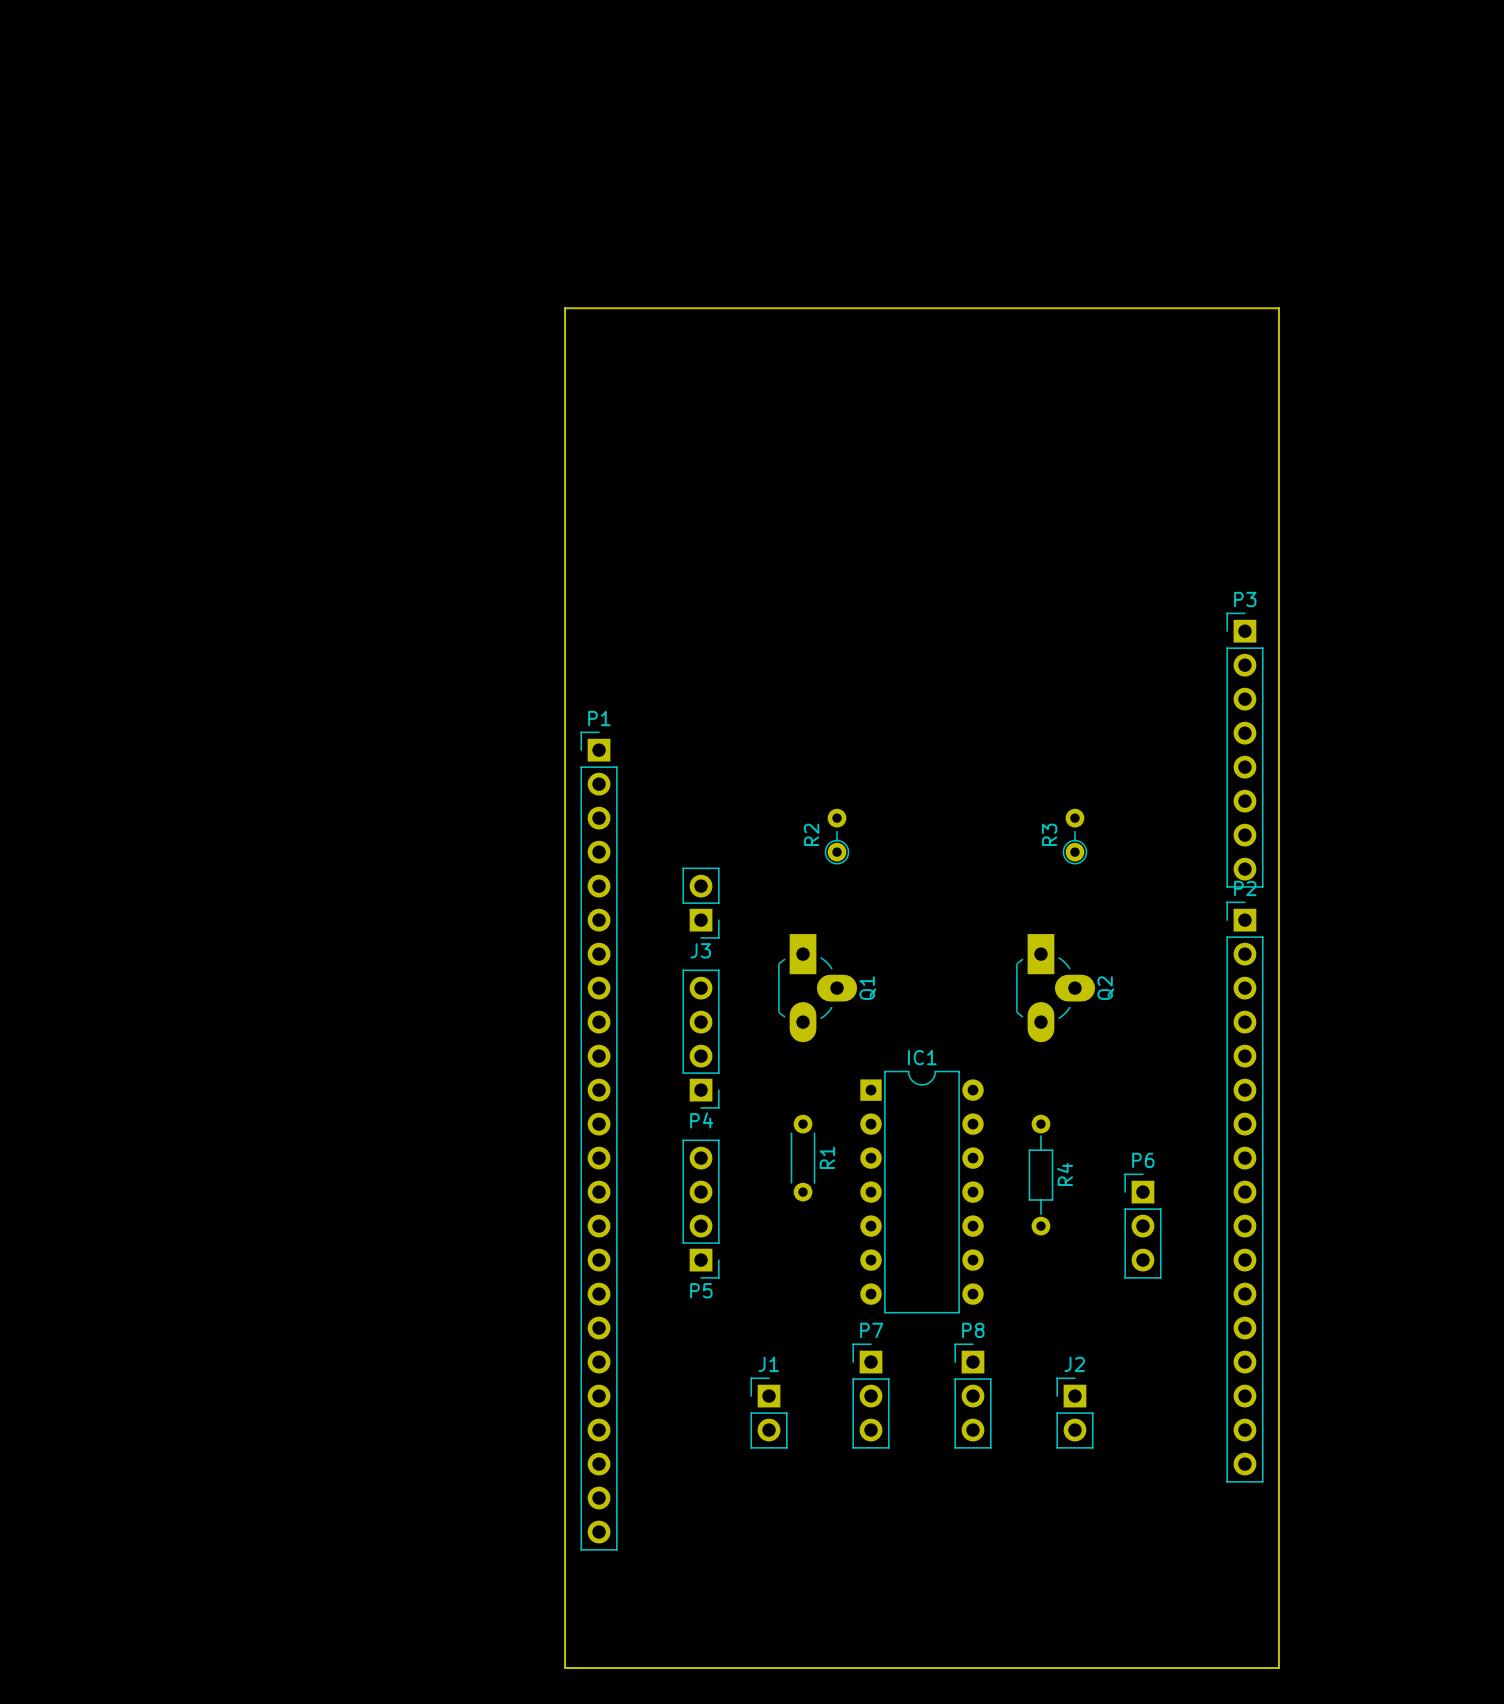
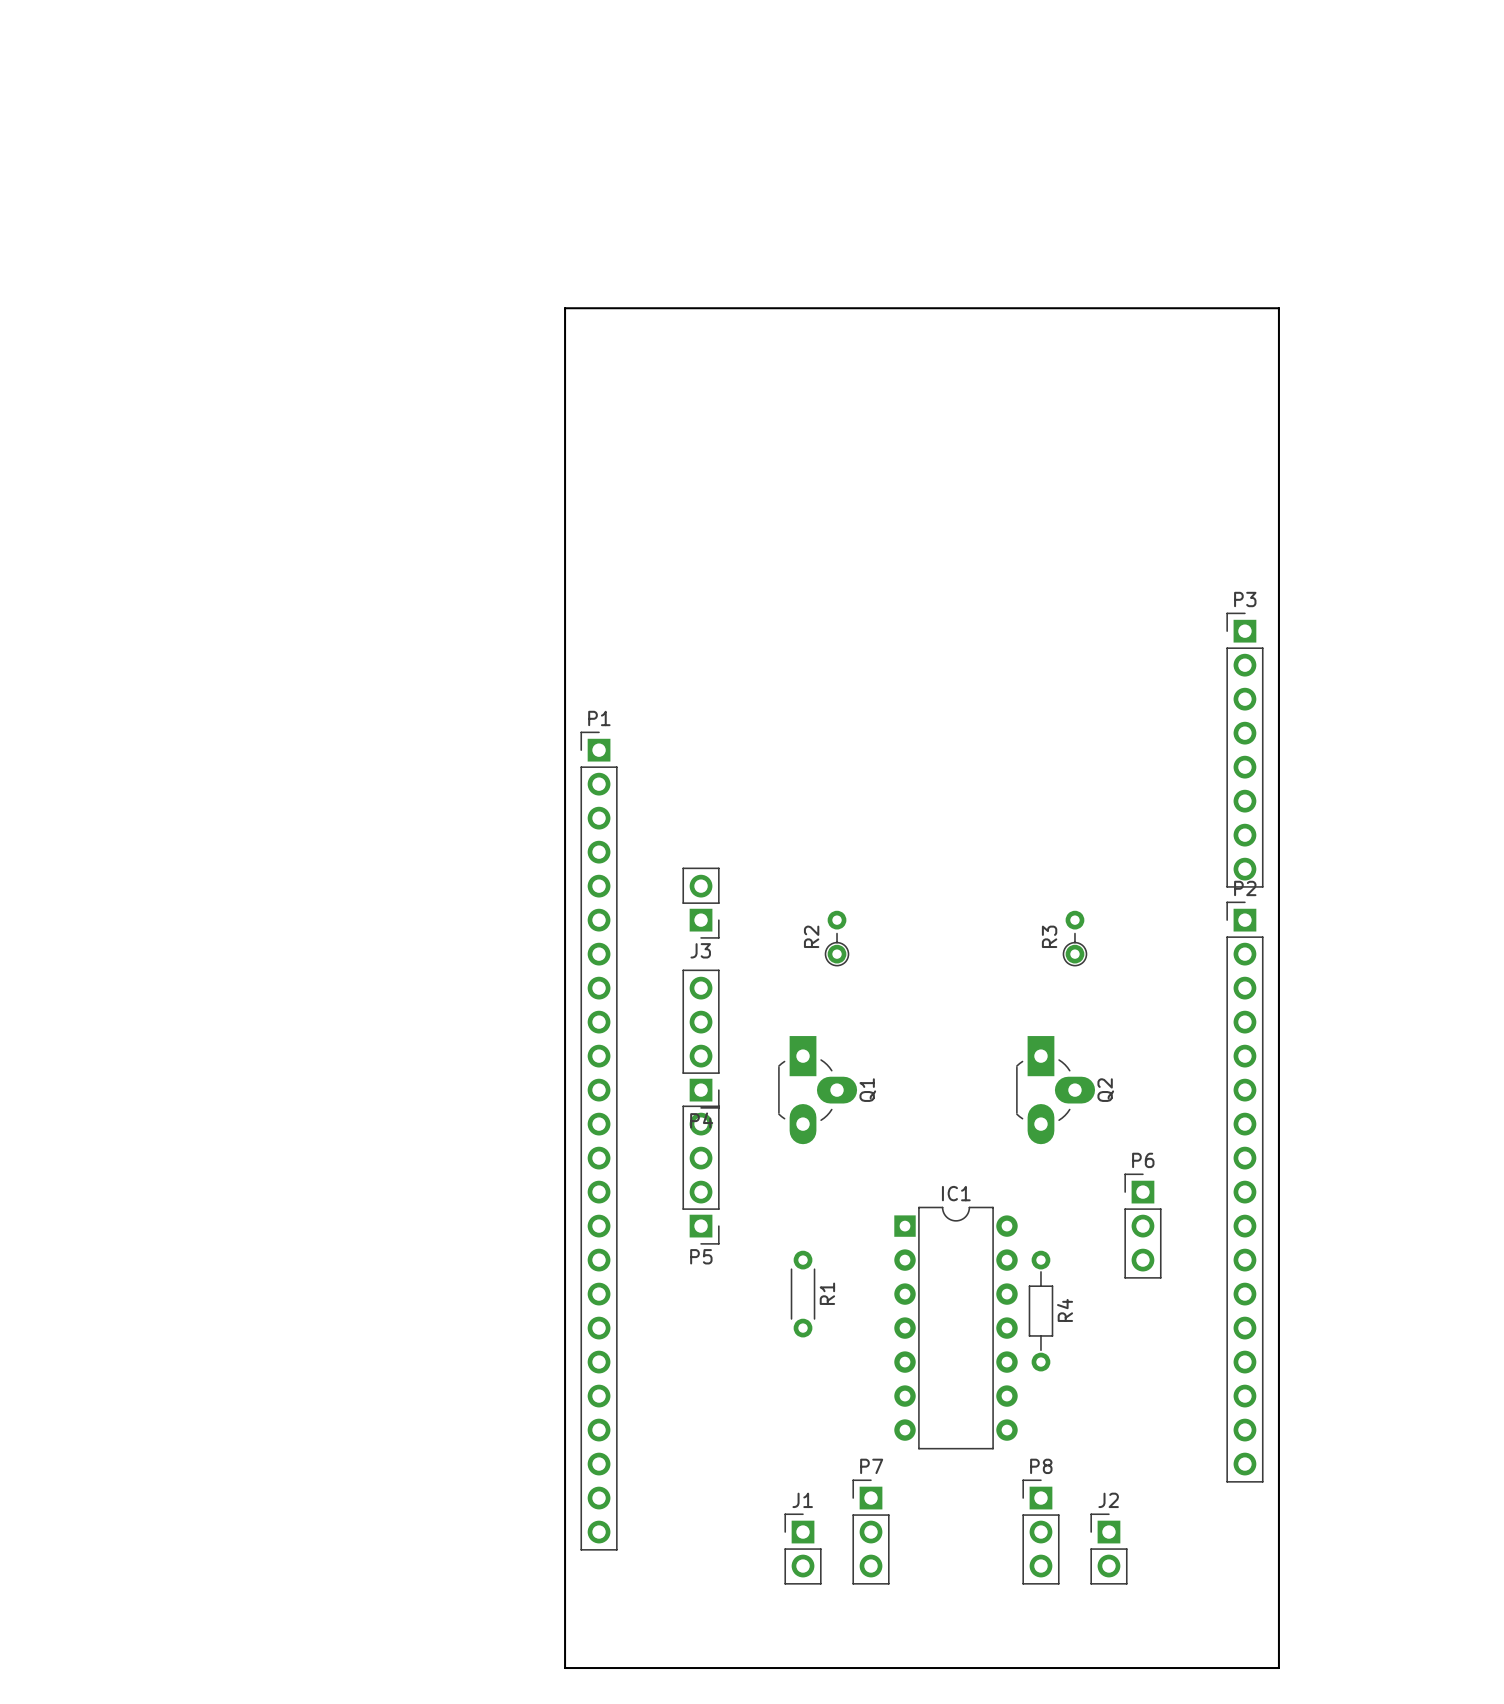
R2 position: (837, 836) -> (837, 938)
R3 position: (1074, 836) -> (1074, 938)
Q1 position: (817, 988) -> (817, 1090)
Q2 position: (1055, 988) -> (1055, 1090)
R1 position: (803, 1158) -> (803, 1294)
R4 position: (1040, 1175) -> (1040, 1311)
IC1 position: (922, 1192) -> (955, 1328)
P5 position: (701, 1209) -> (701, 1175)
P7 position: (871, 1396) -> (871, 1532)
P8 position: (972, 1396) -> (1040, 1532)
J1 position: (769, 1413) -> (803, 1549)
J2 position: (1074, 1413) -> (1108, 1549)

